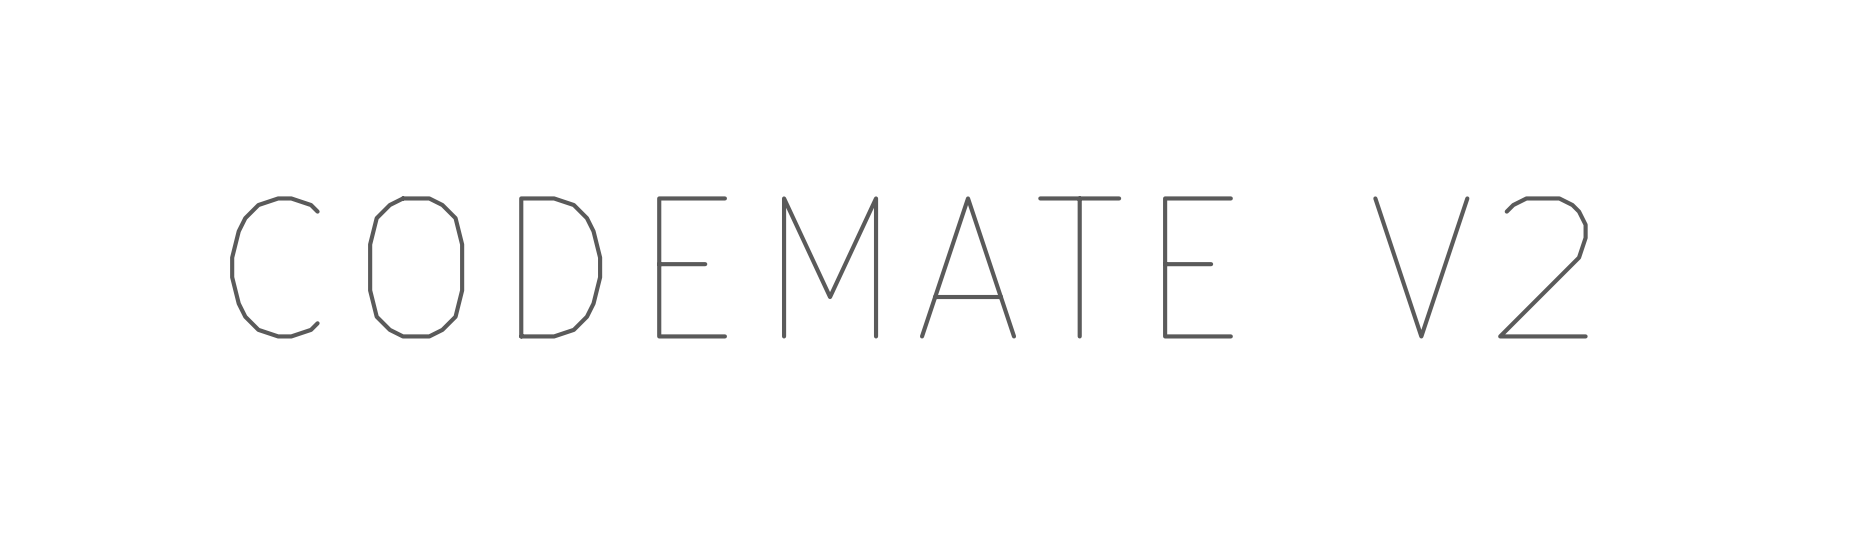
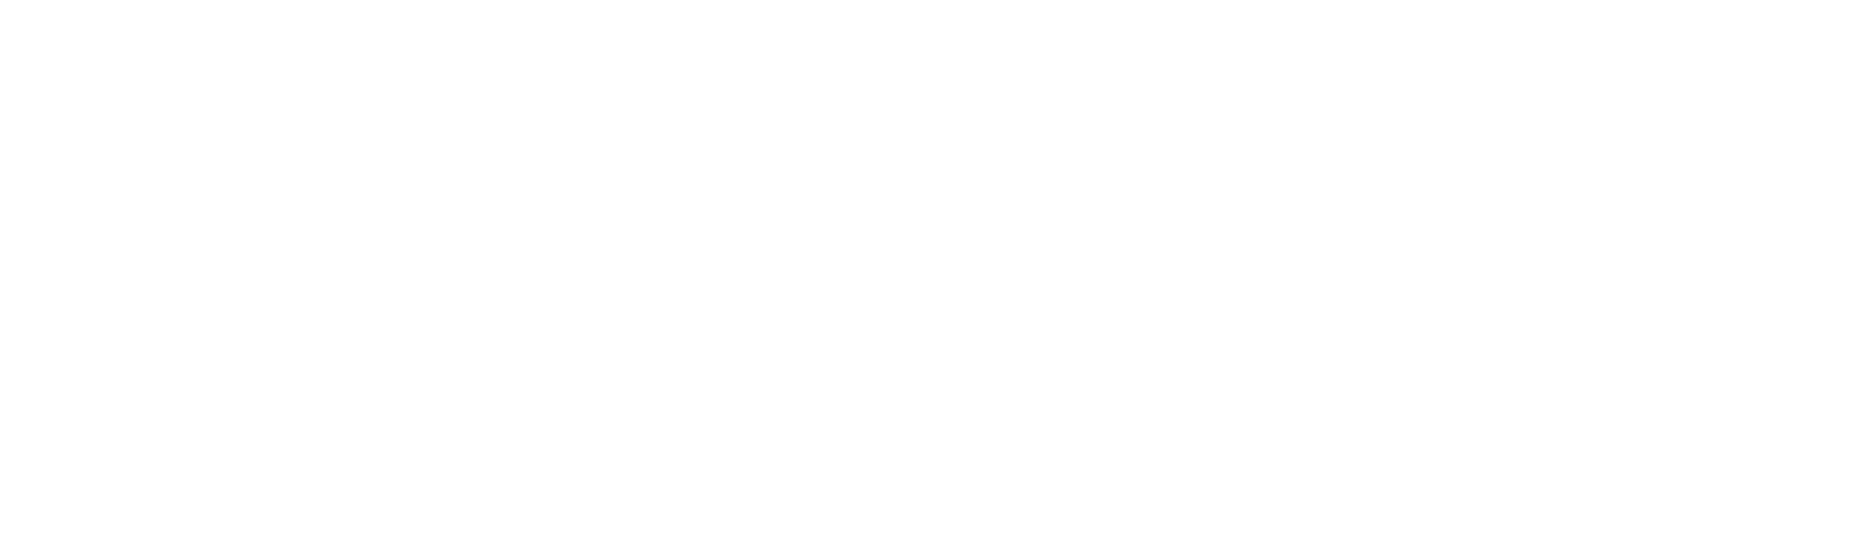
text: CODEMATE V2 (908, 267) -> none

